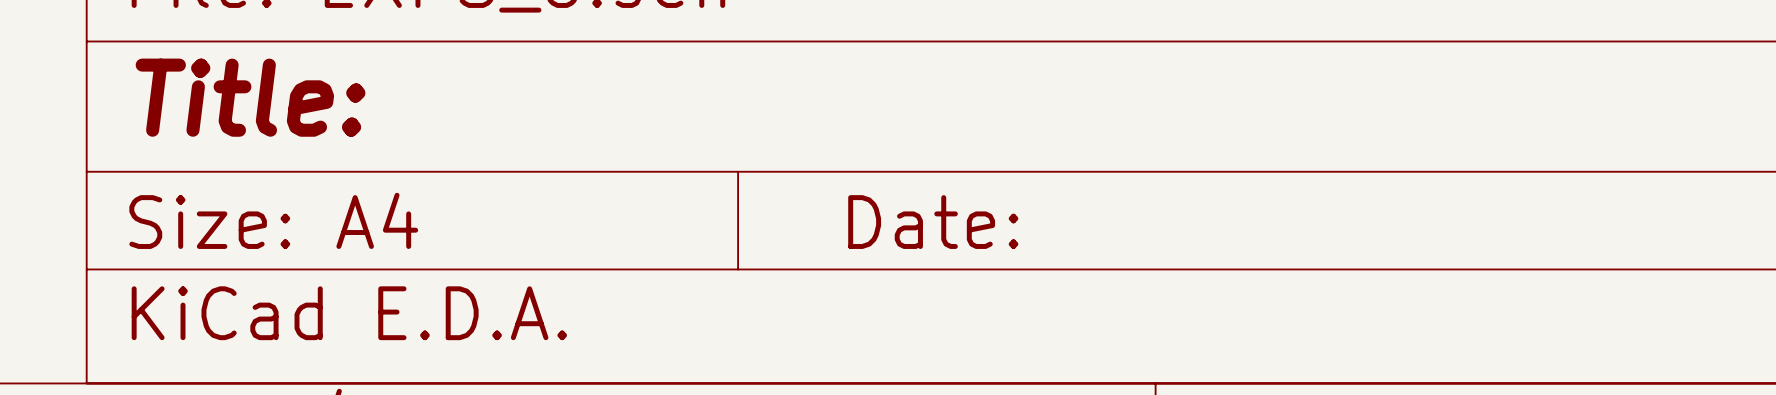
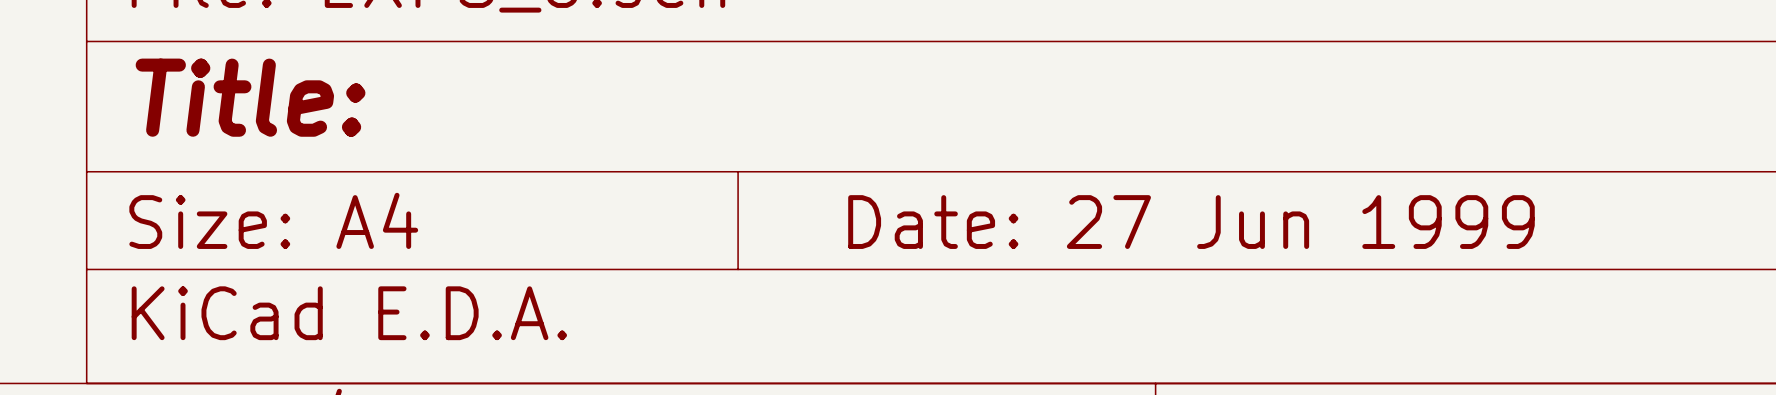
title block: Date: (933, 222) -> Date: 27 Jun 1999 (1191, 222)

